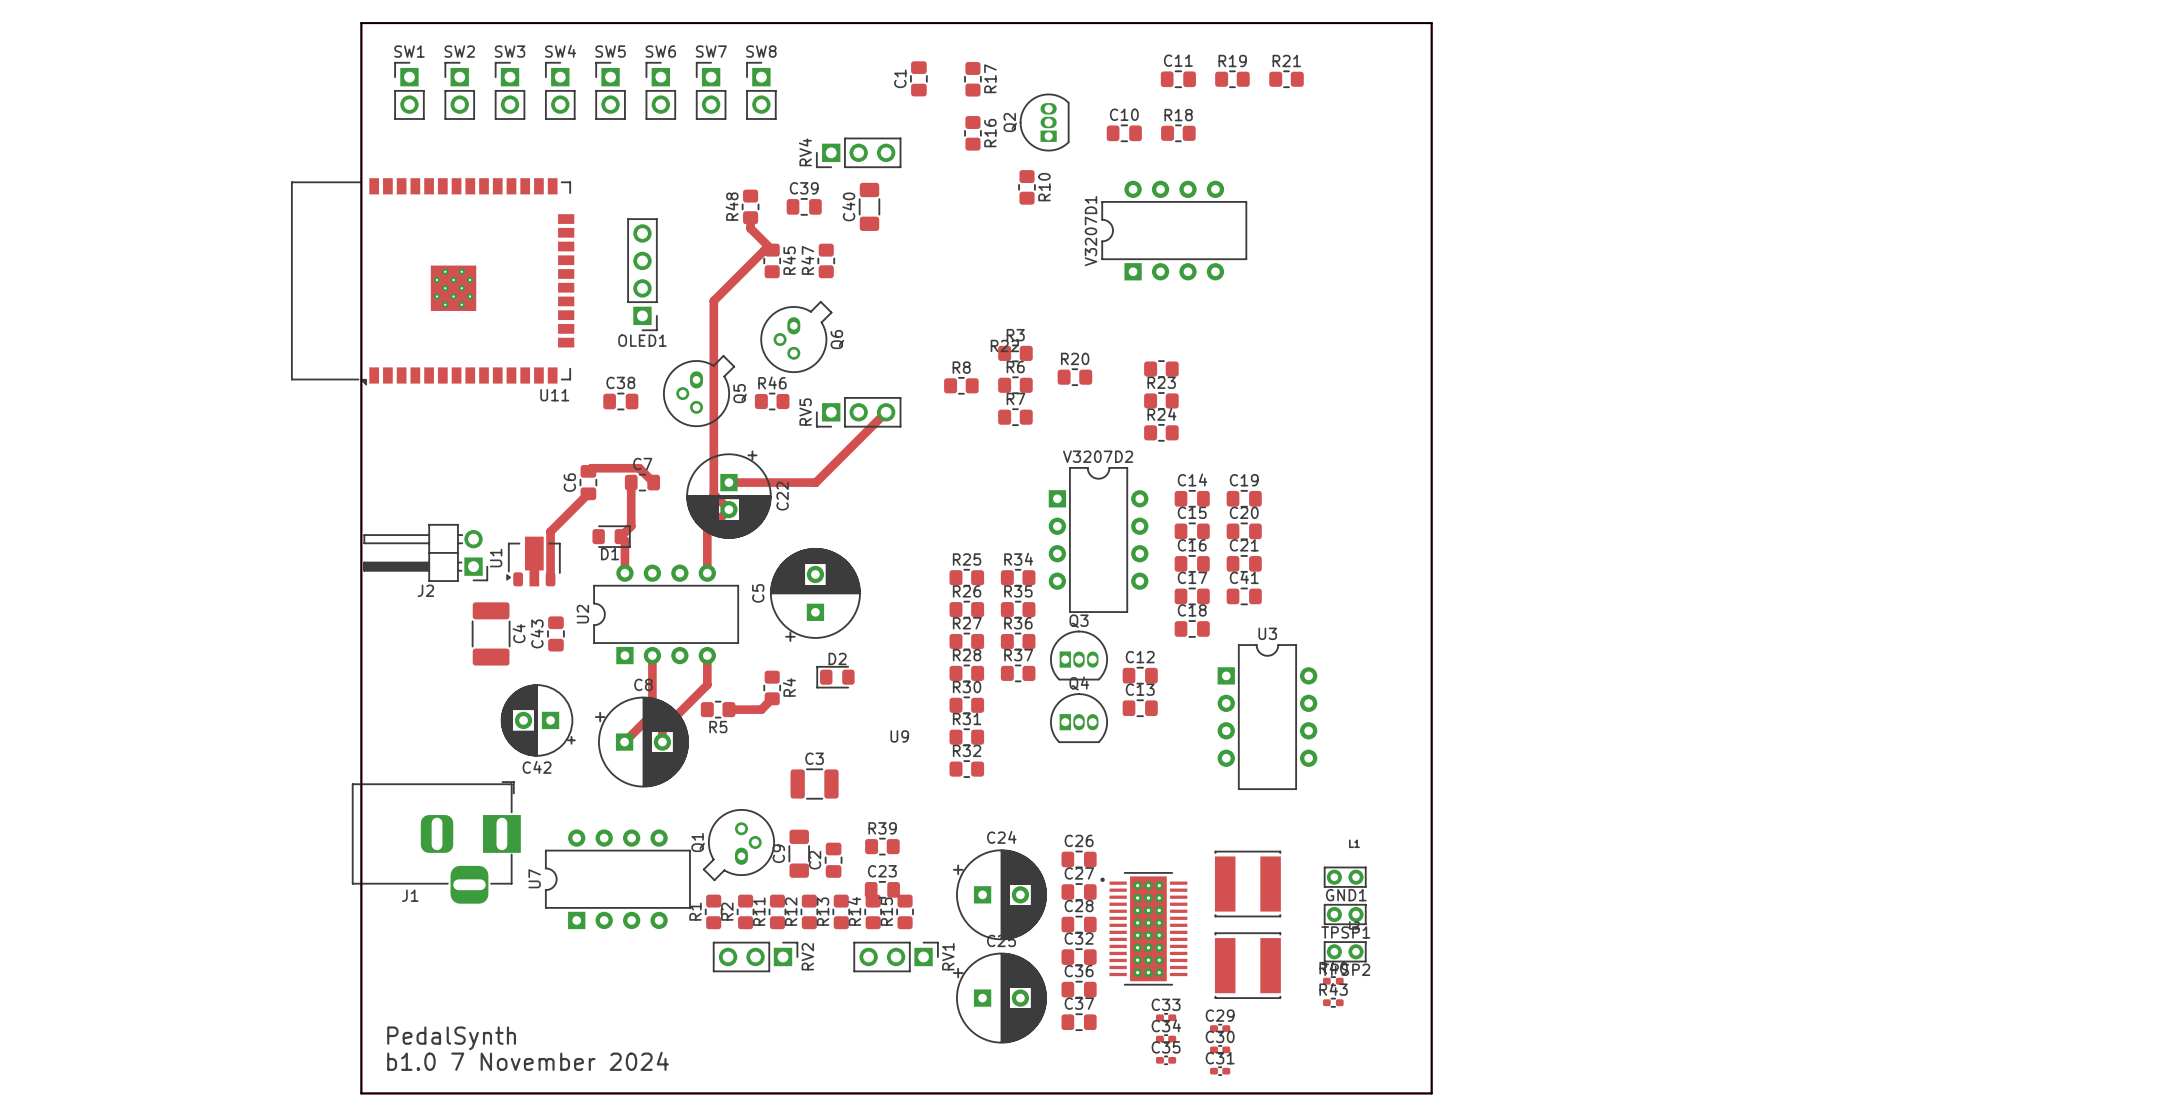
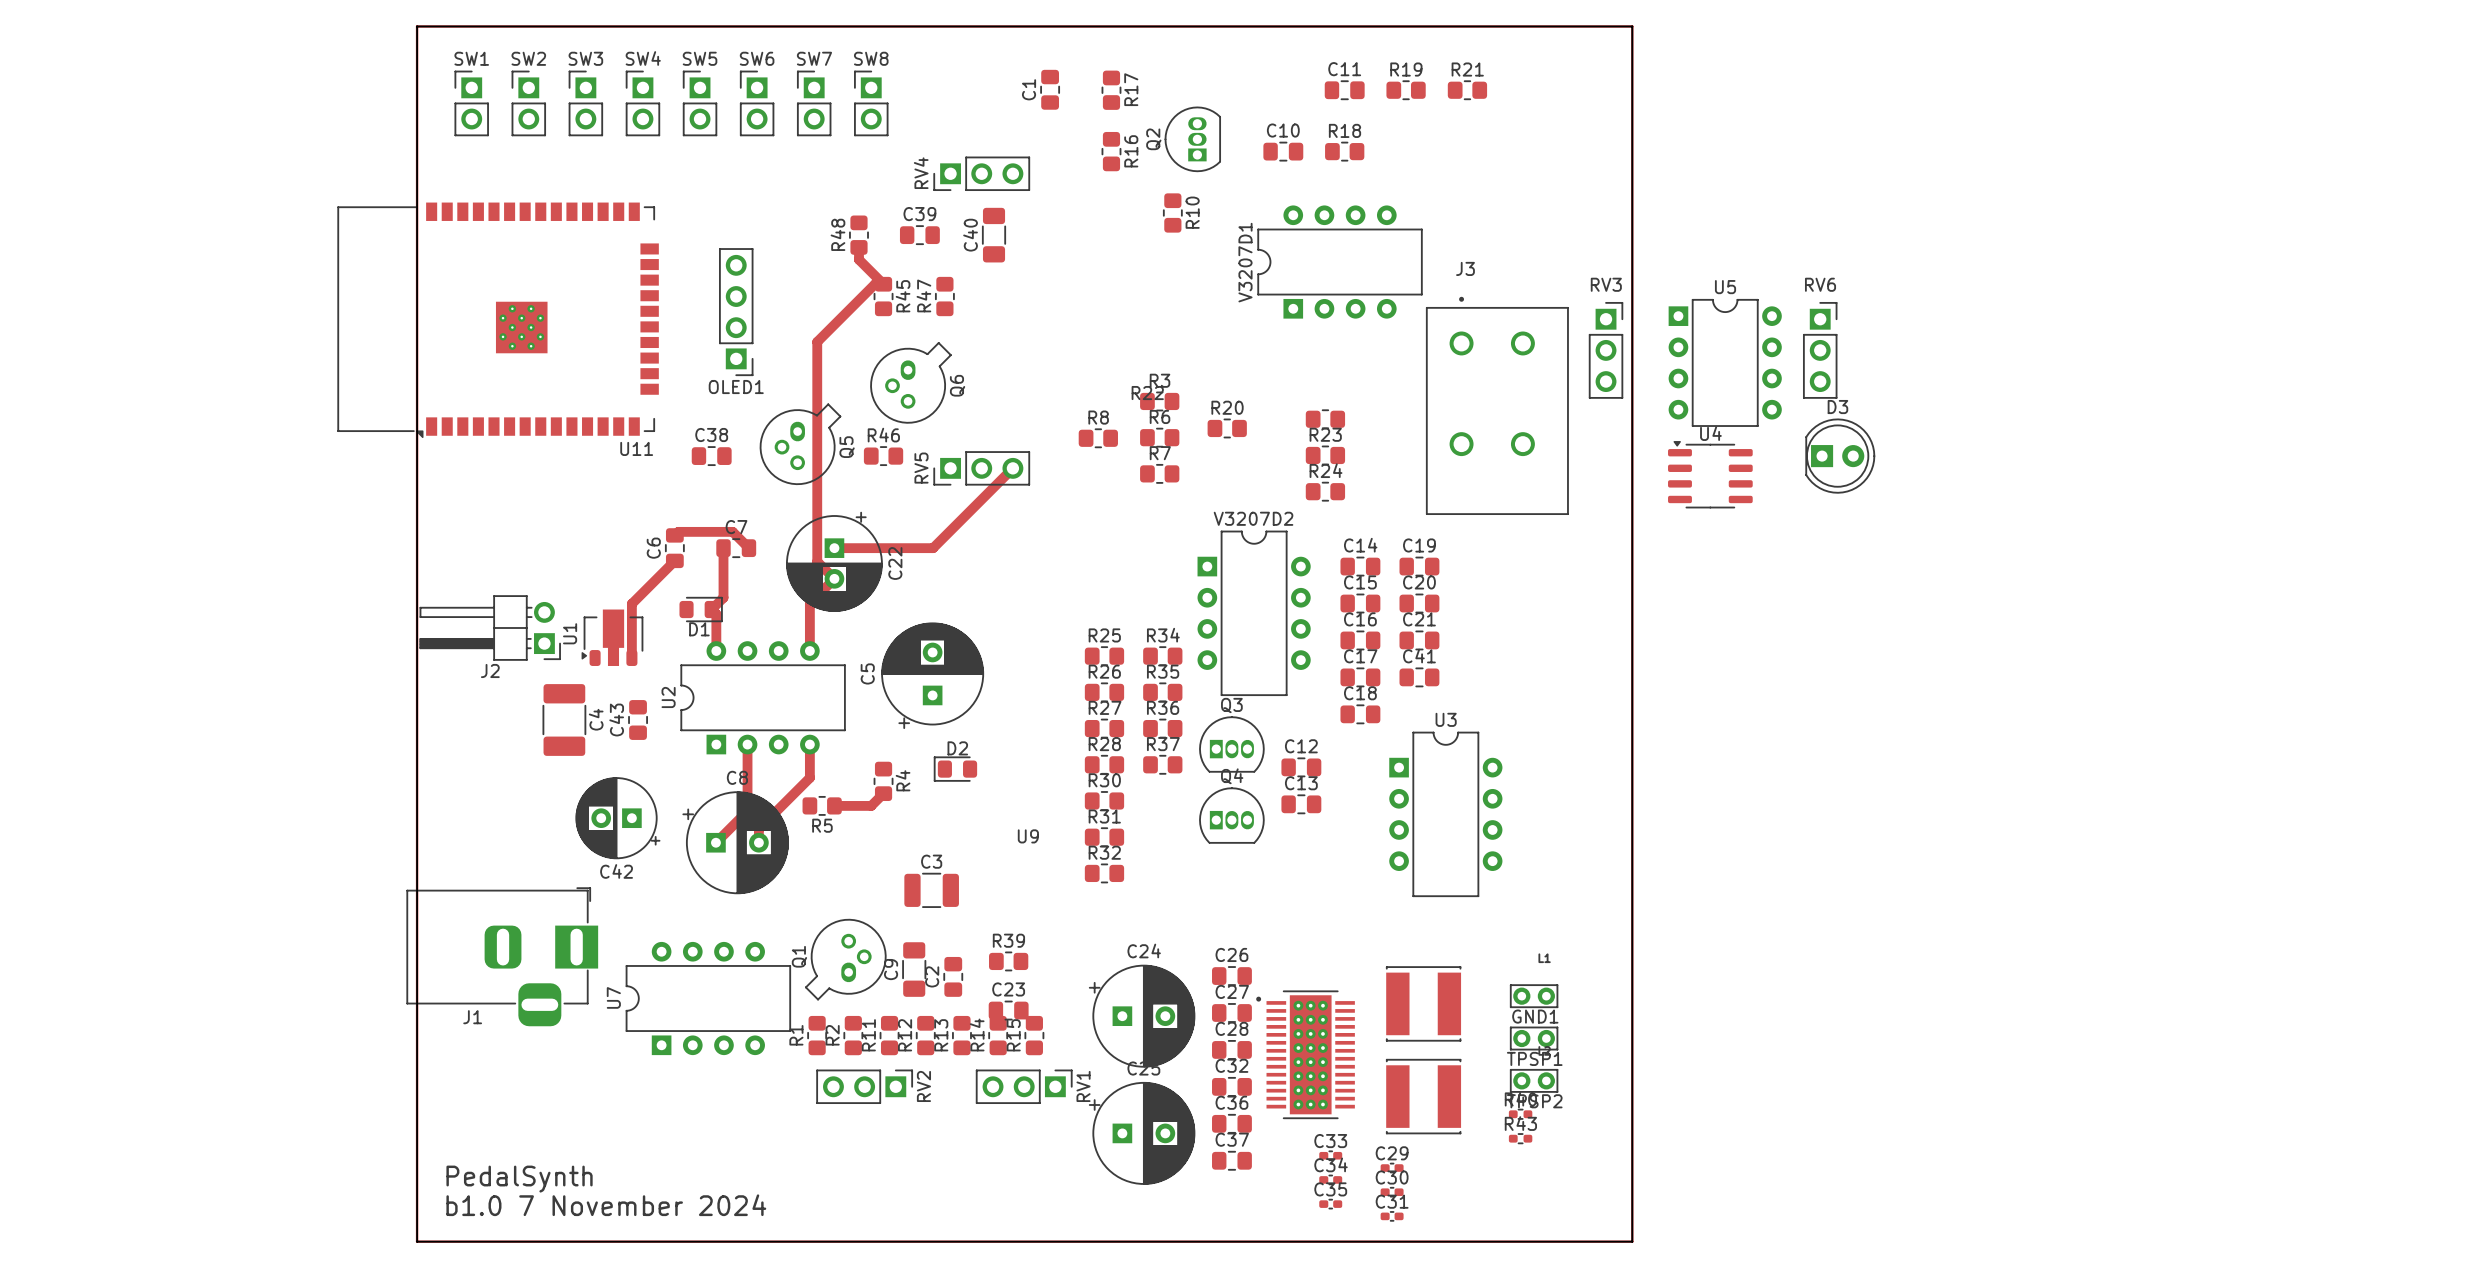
RV3: none -> (1606, 350)
RV6: none -> (1820, 350)
U5: none -> (1725, 362)
J3: none -> (1497, 405)
D3: none -> (1840, 456)
U4: none -> (1710, 474)

